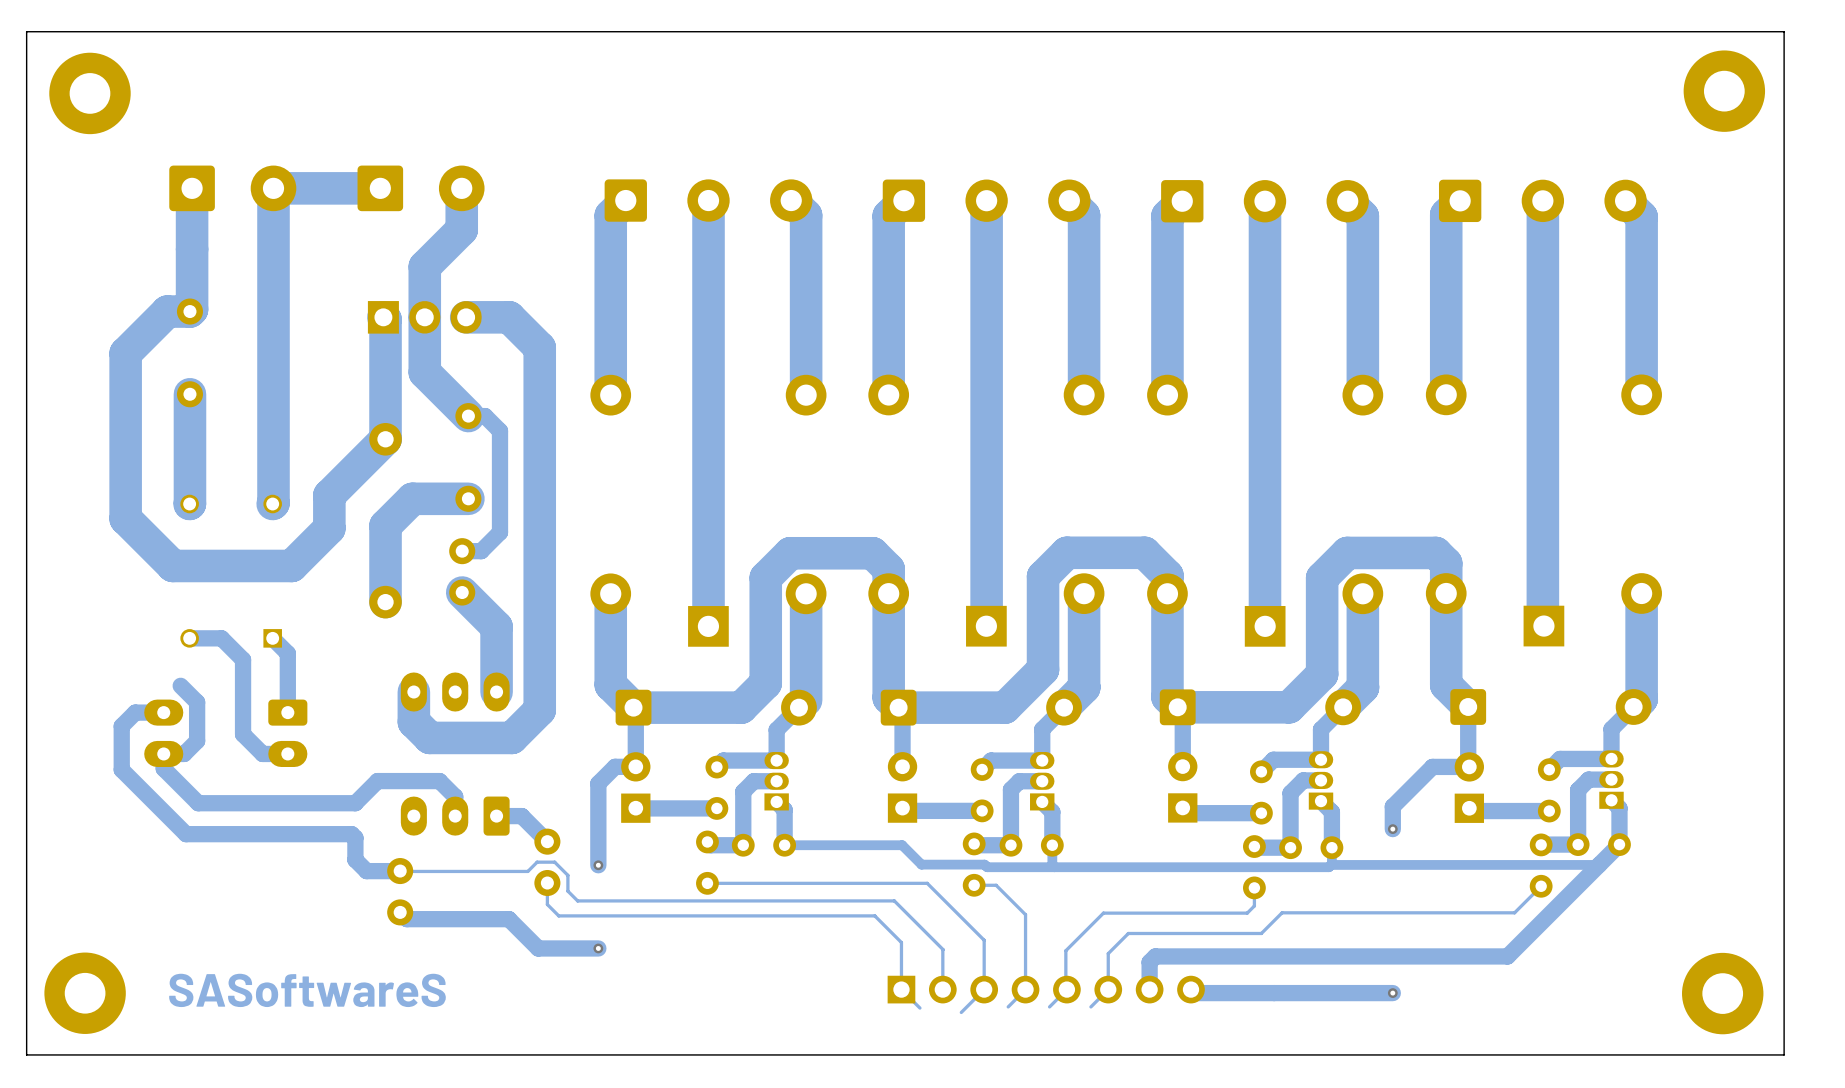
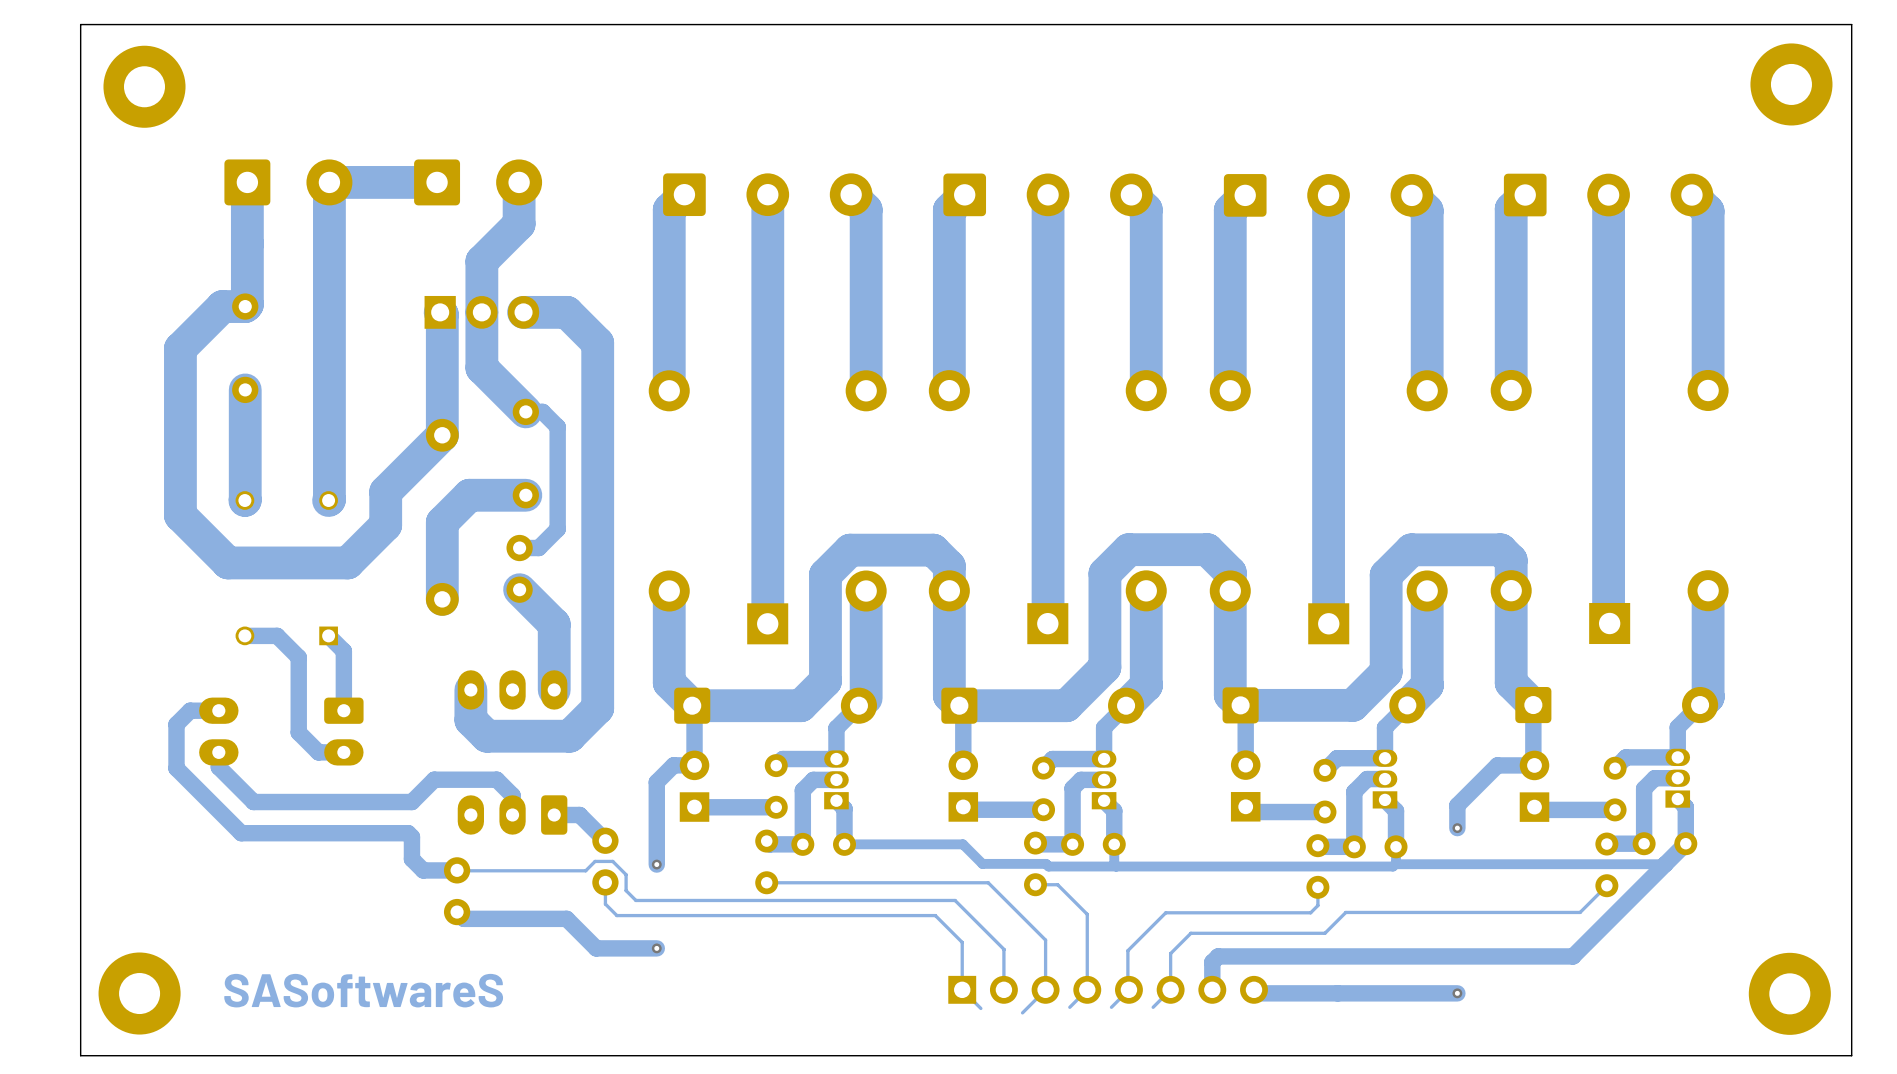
track: (180, 685) (197, 702) (197, 741) (184, 753) (163, 753) -> none

